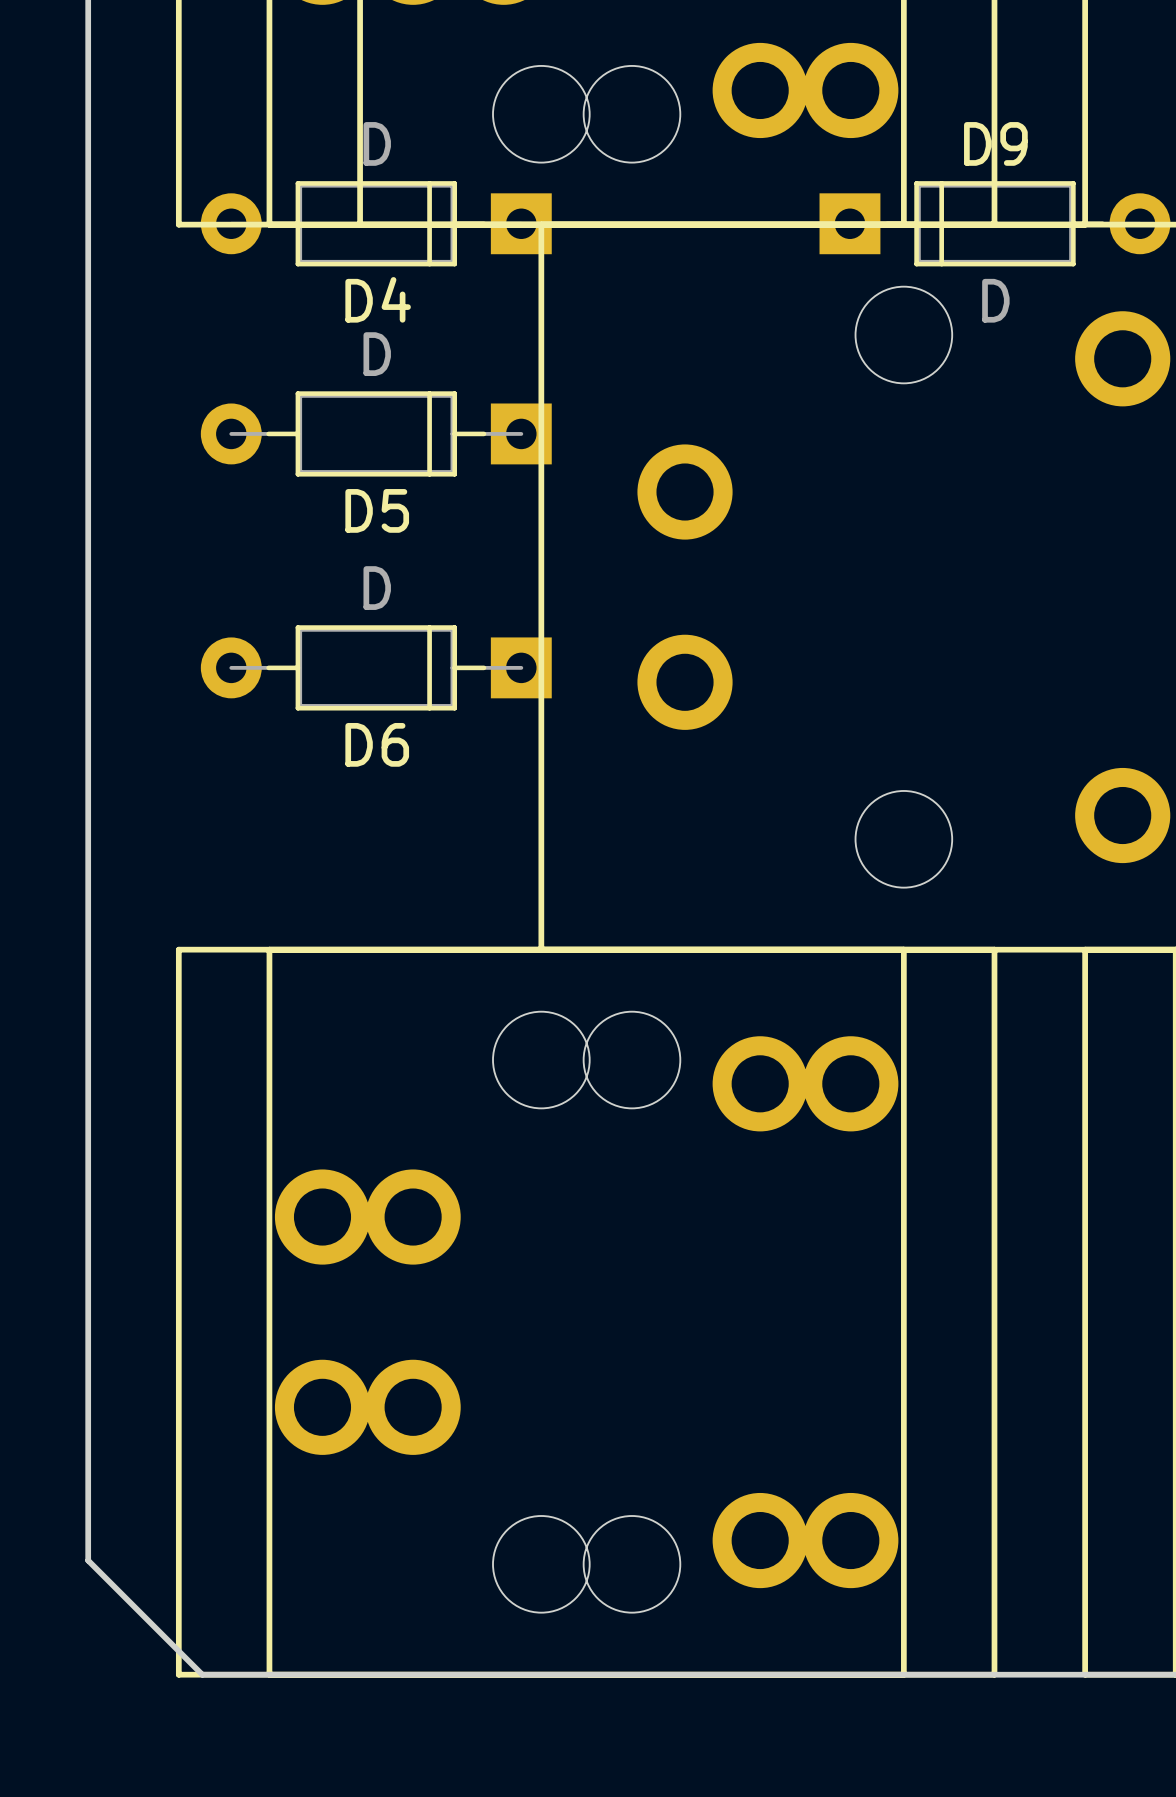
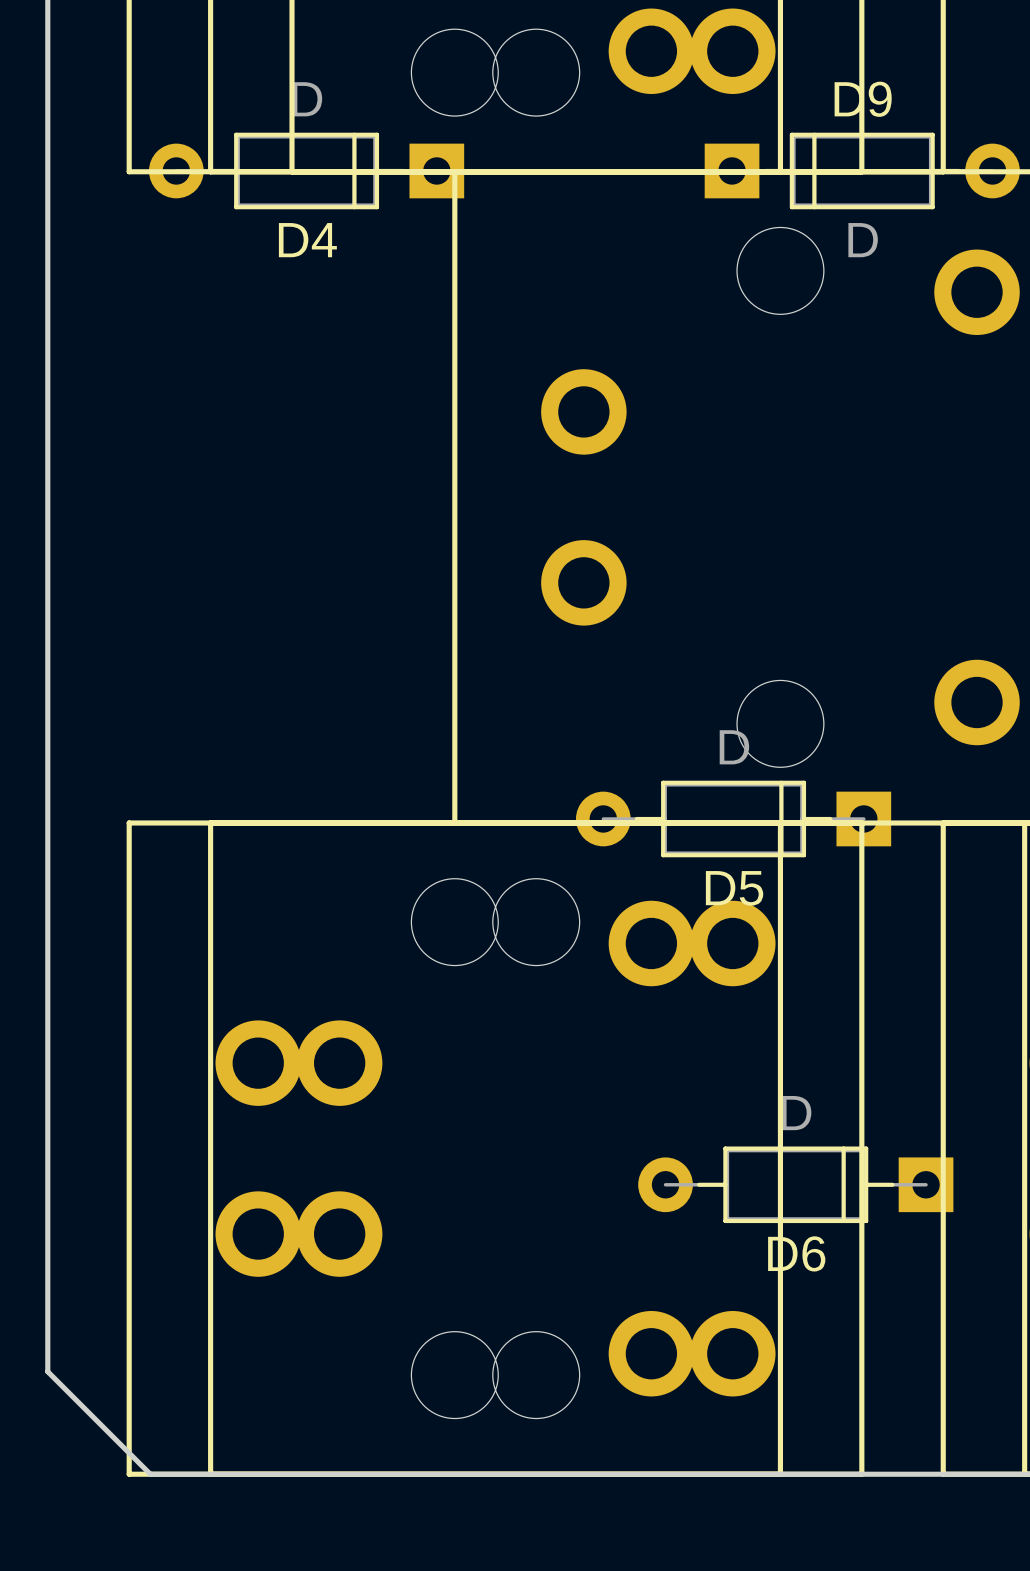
D5 position: (376, 433) -> (733, 818)
D6 position: (376, 667) -> (795, 1184)

